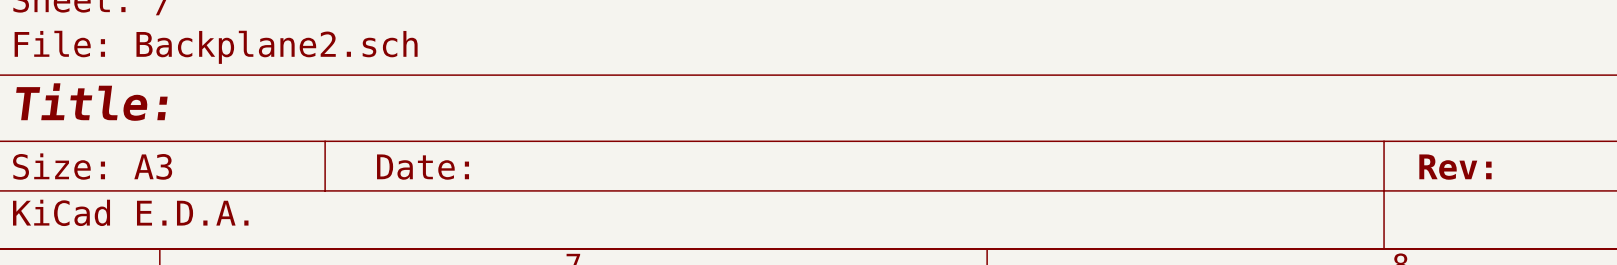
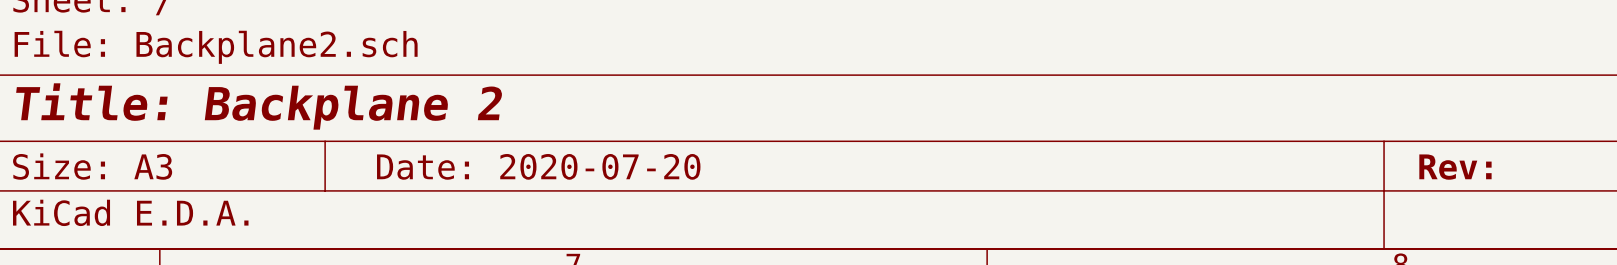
title block: Title: (91, 102) -> Title: Backplane 2 (259, 106)
title block: Date: (423, 167) -> Date: 2020-07-20 (538, 166)

